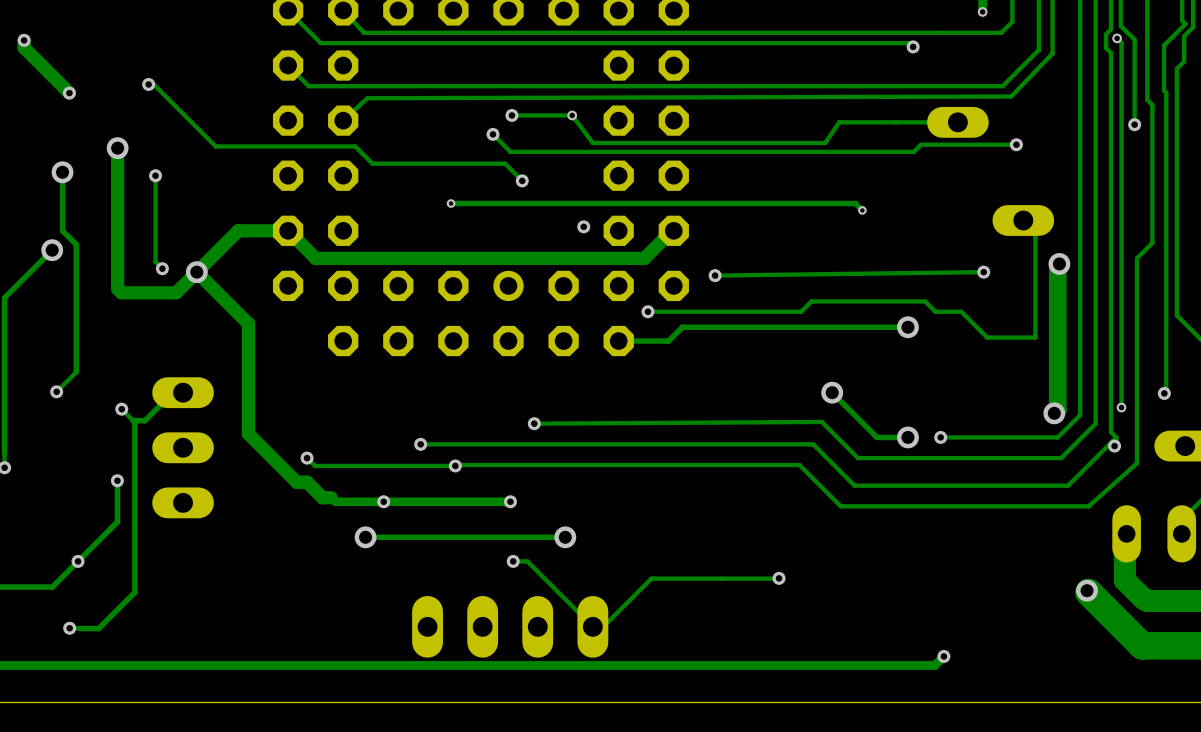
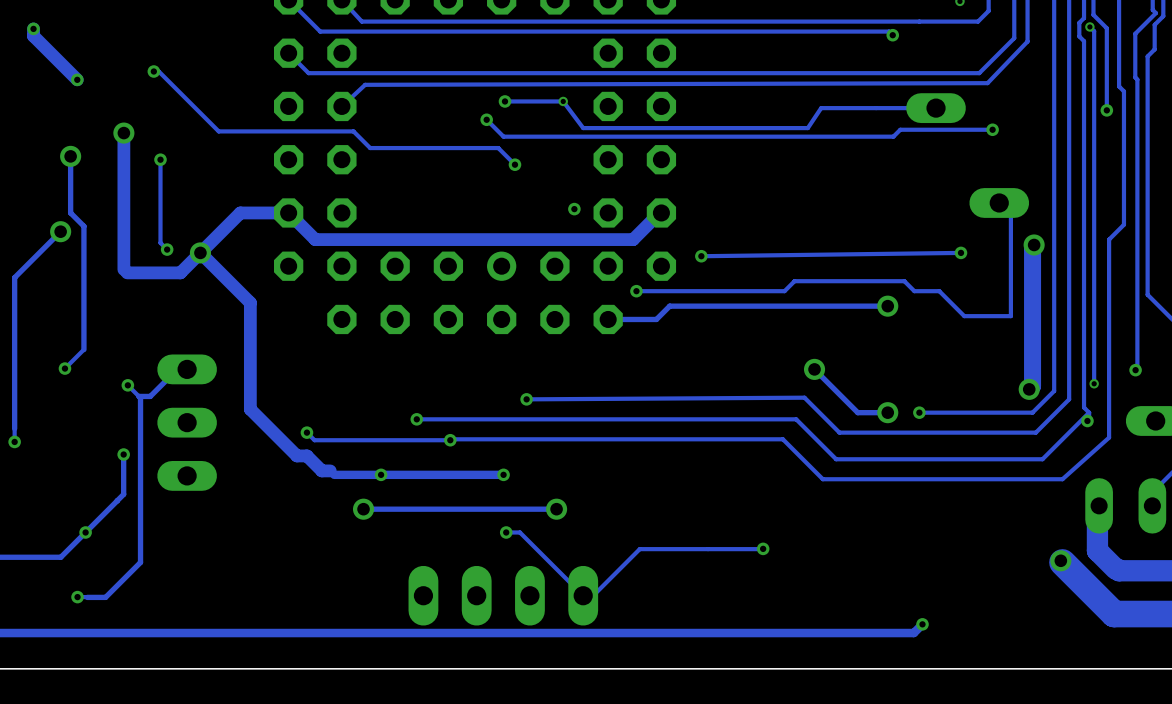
track: (451, 203) (855, 203) (862, 210) -> none
via: (451, 203) -> none
via: (862, 210) -> none

